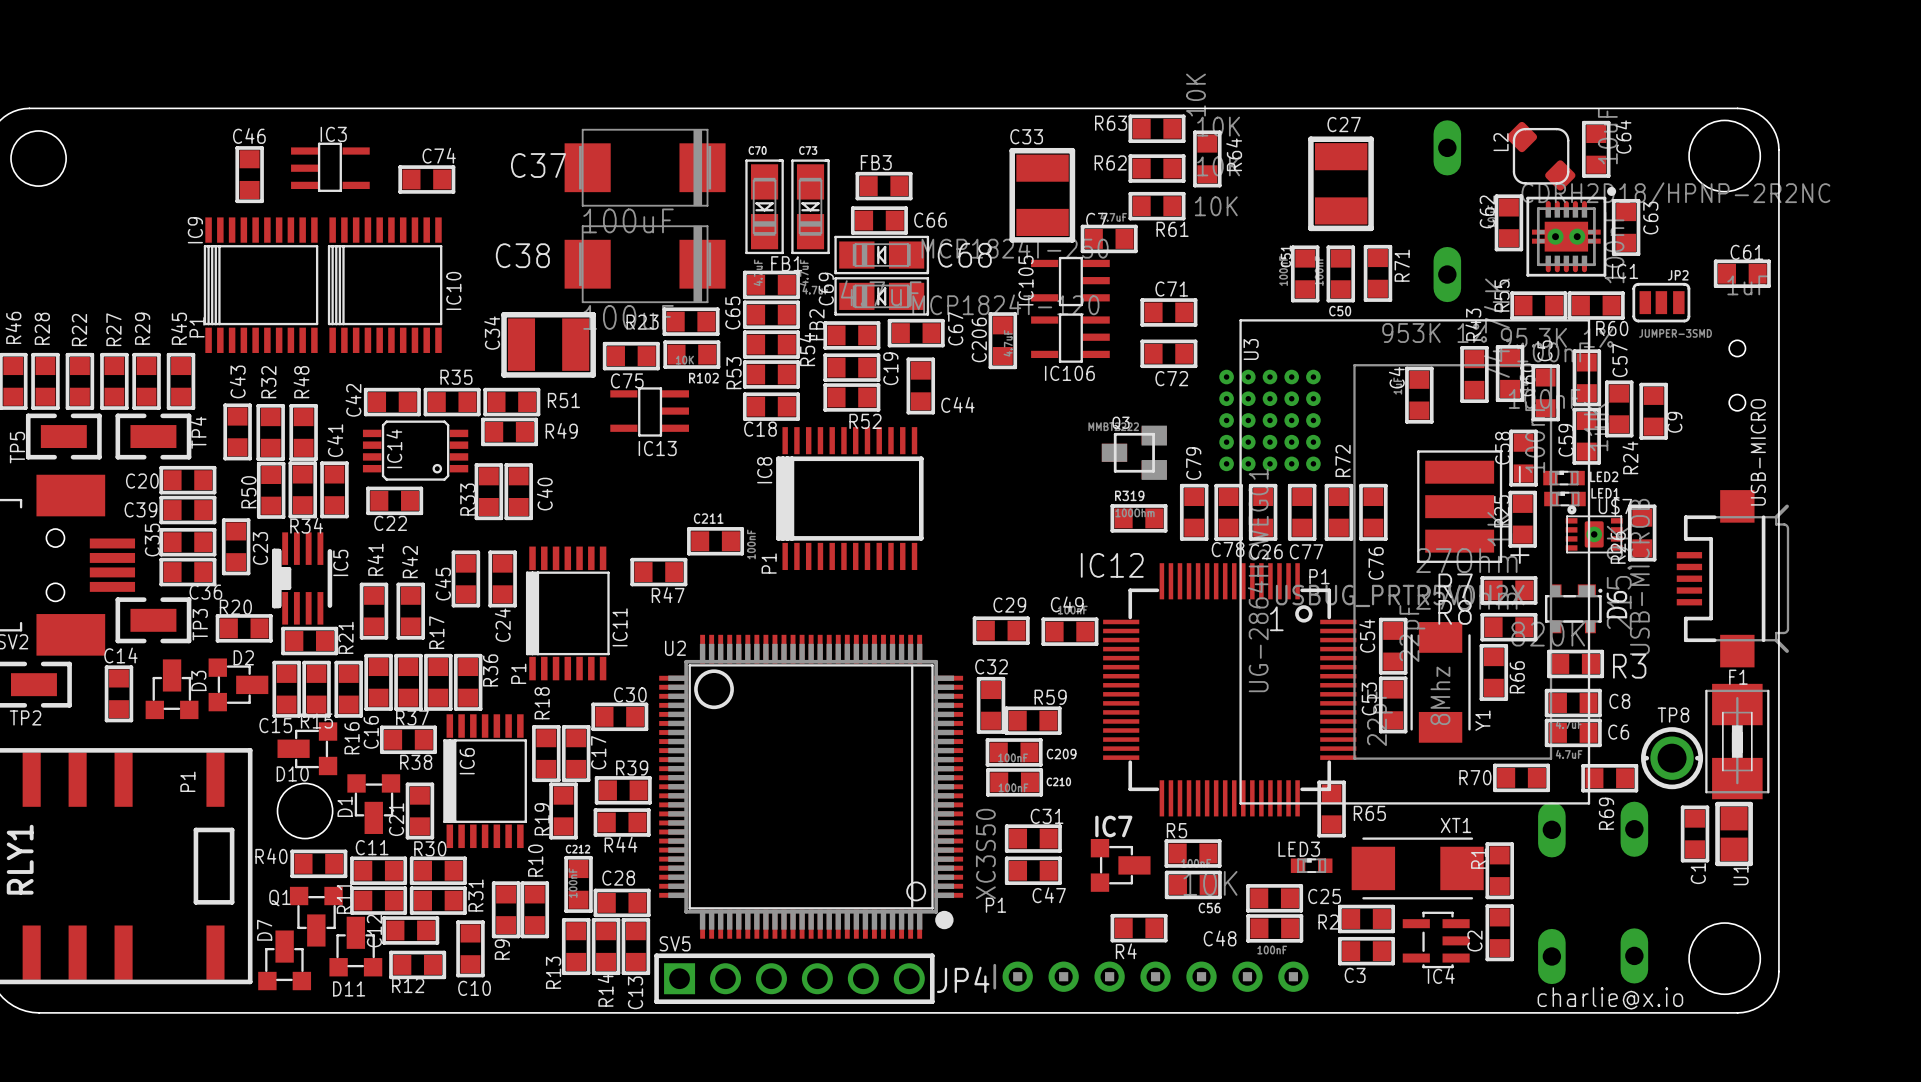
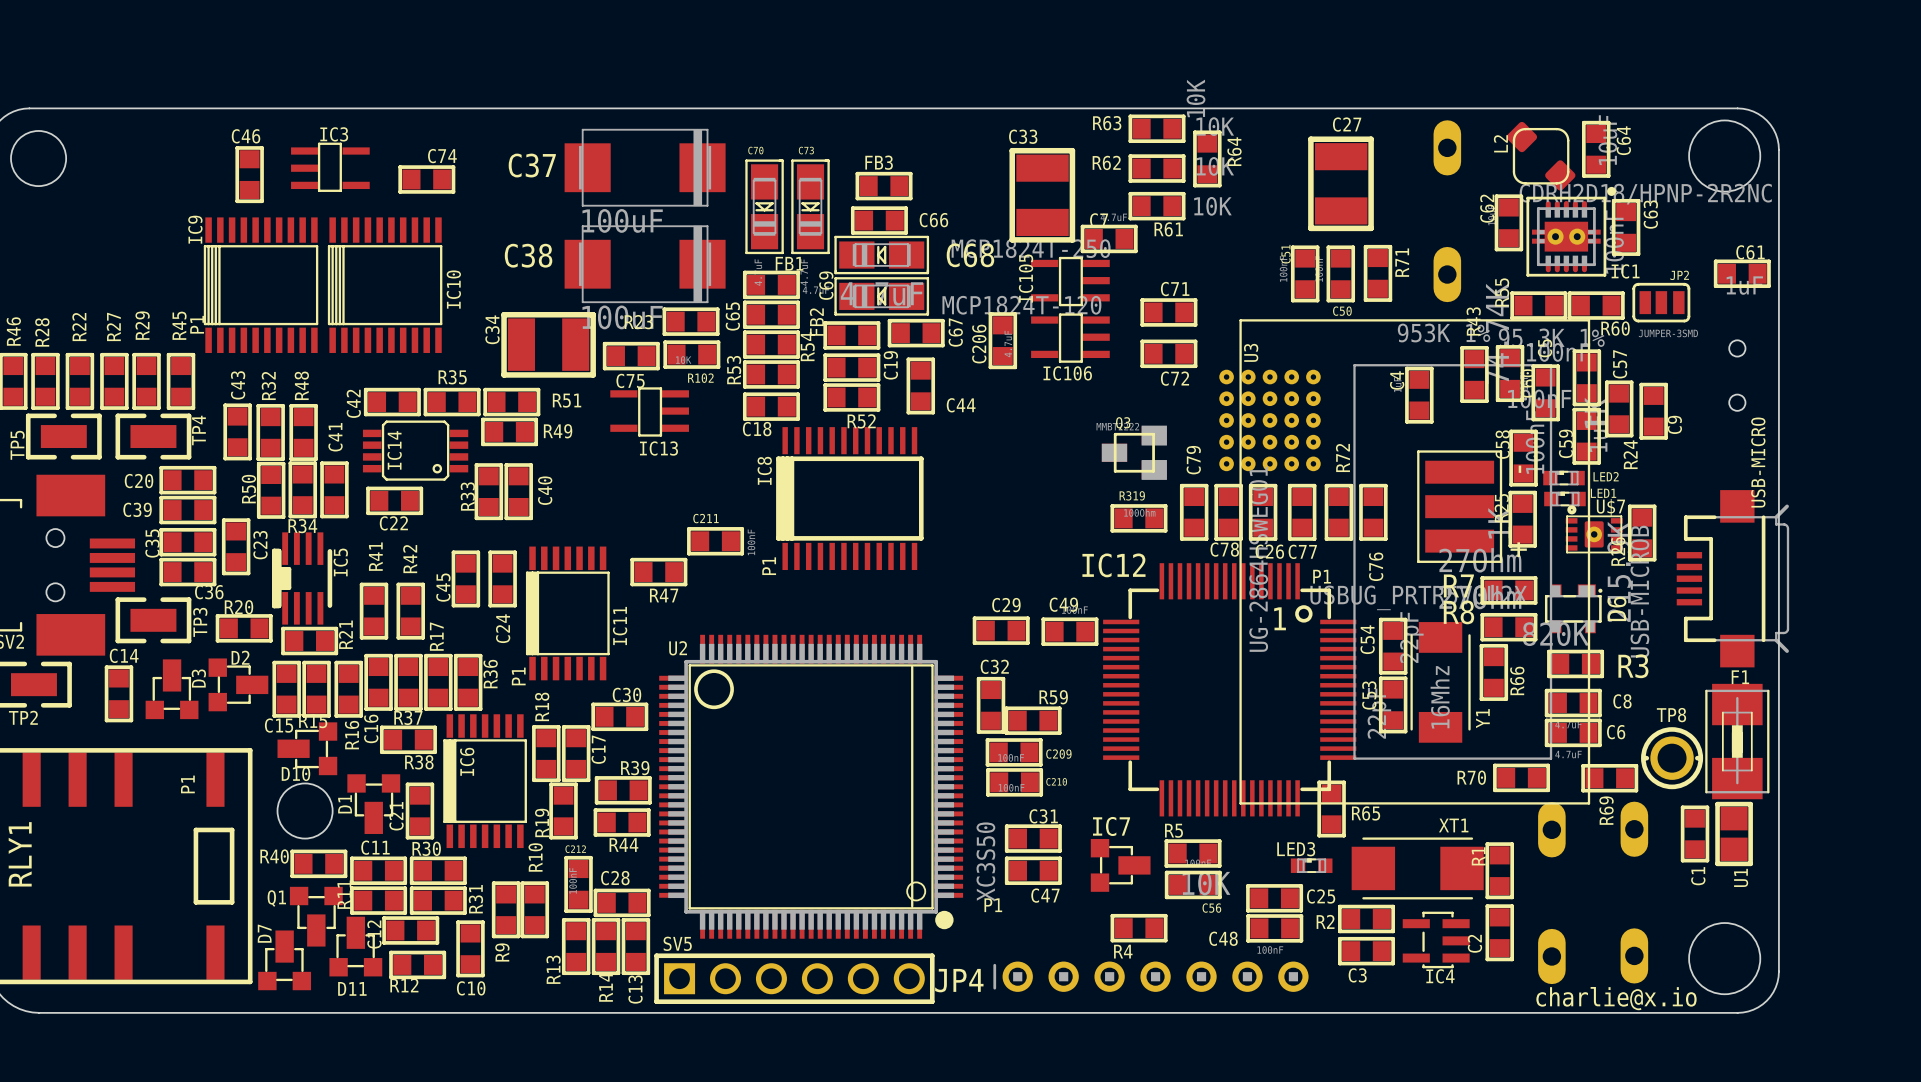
Y1 value: 8Mhz (1440, 695) -> 16Mhz (1440, 697)

